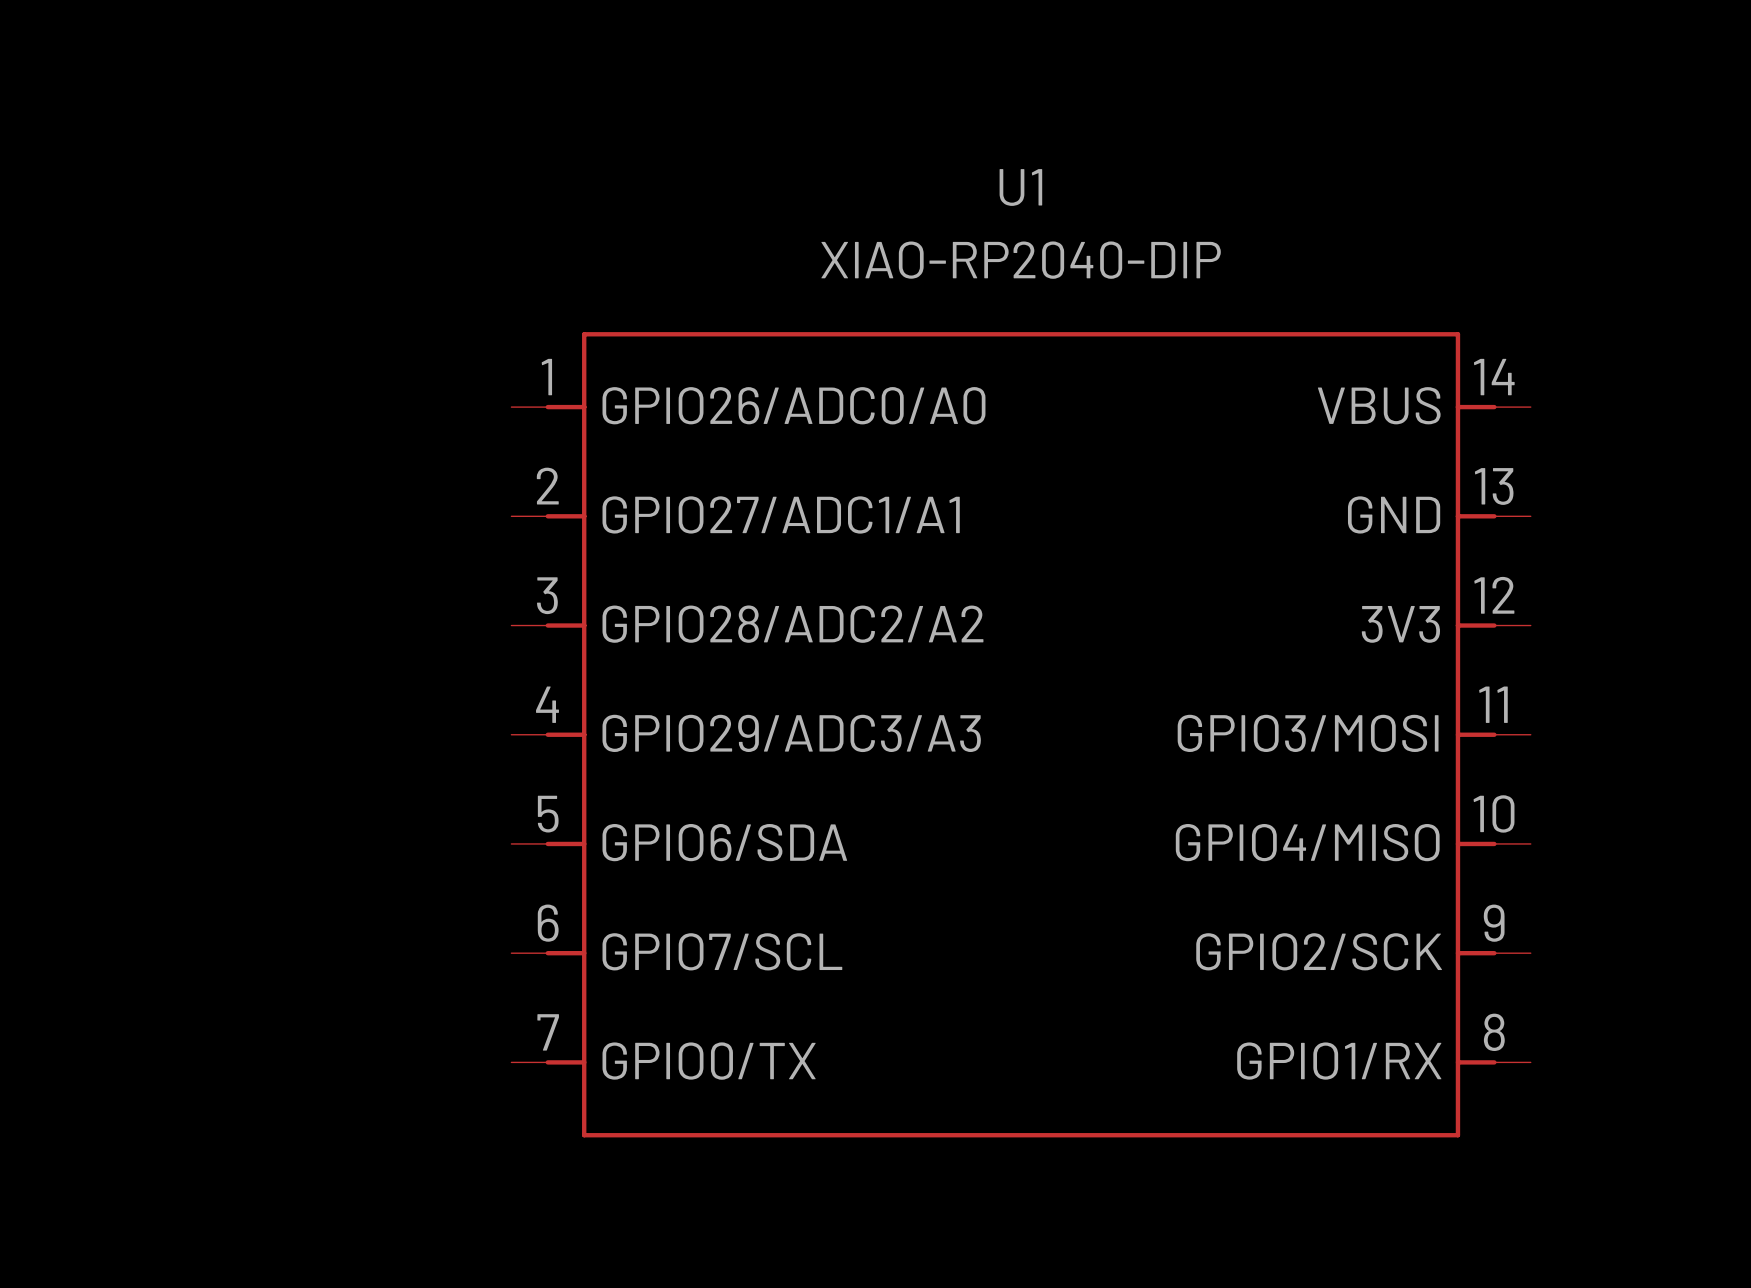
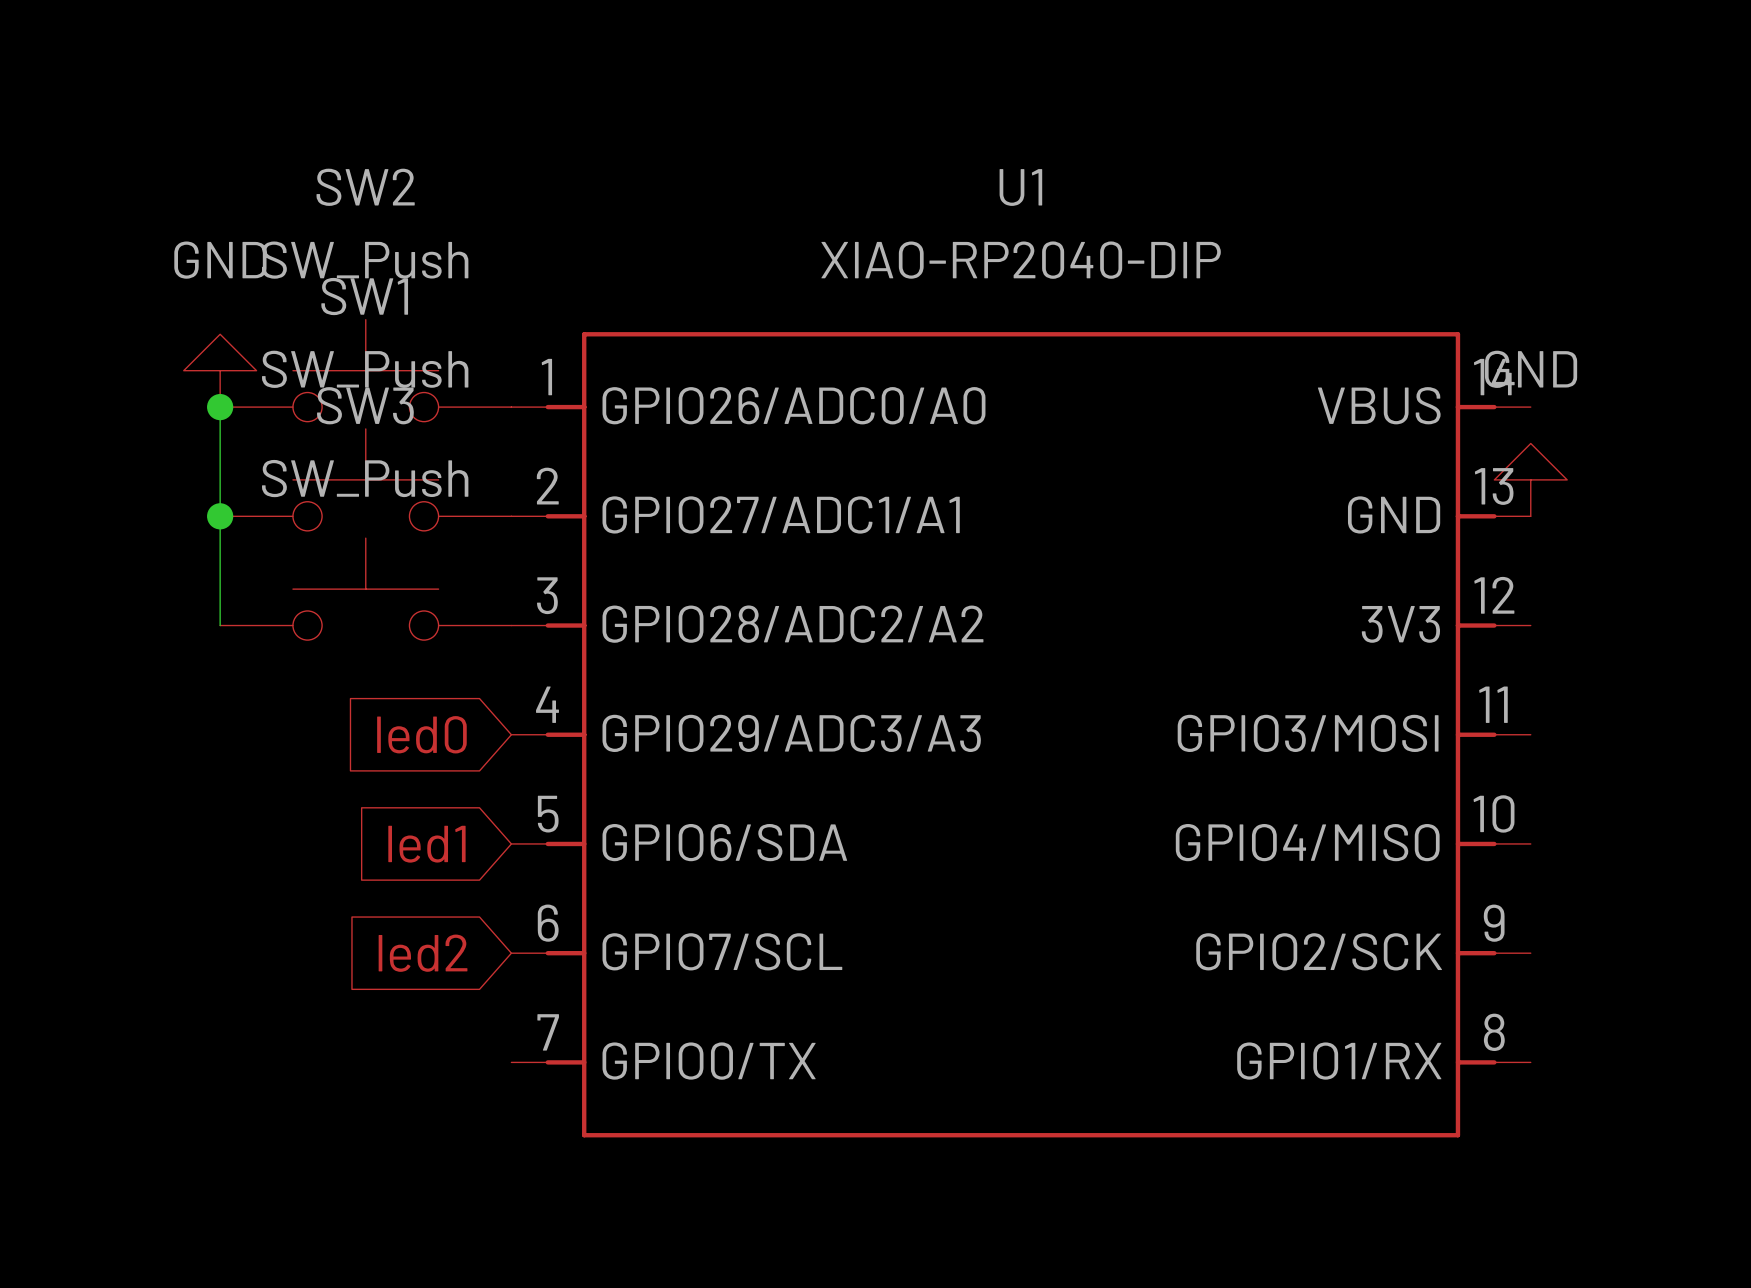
power symbol: none -> GND (220, 370)
SW2: none -> SW_Push (365, 370)
wire: none -> (220, 407) (220, 625)
junction: none -> (220, 407)
SW1: none -> SW_Push (365, 479)
power symbol: none -> GND (1530, 479)
junction: none -> (220, 516)
SW3: none -> SW_Push (365, 589)
global label: none -> led0 (421, 734)
global label: none -> led1 (426, 844)
global label: none -> led2 (423, 953)

